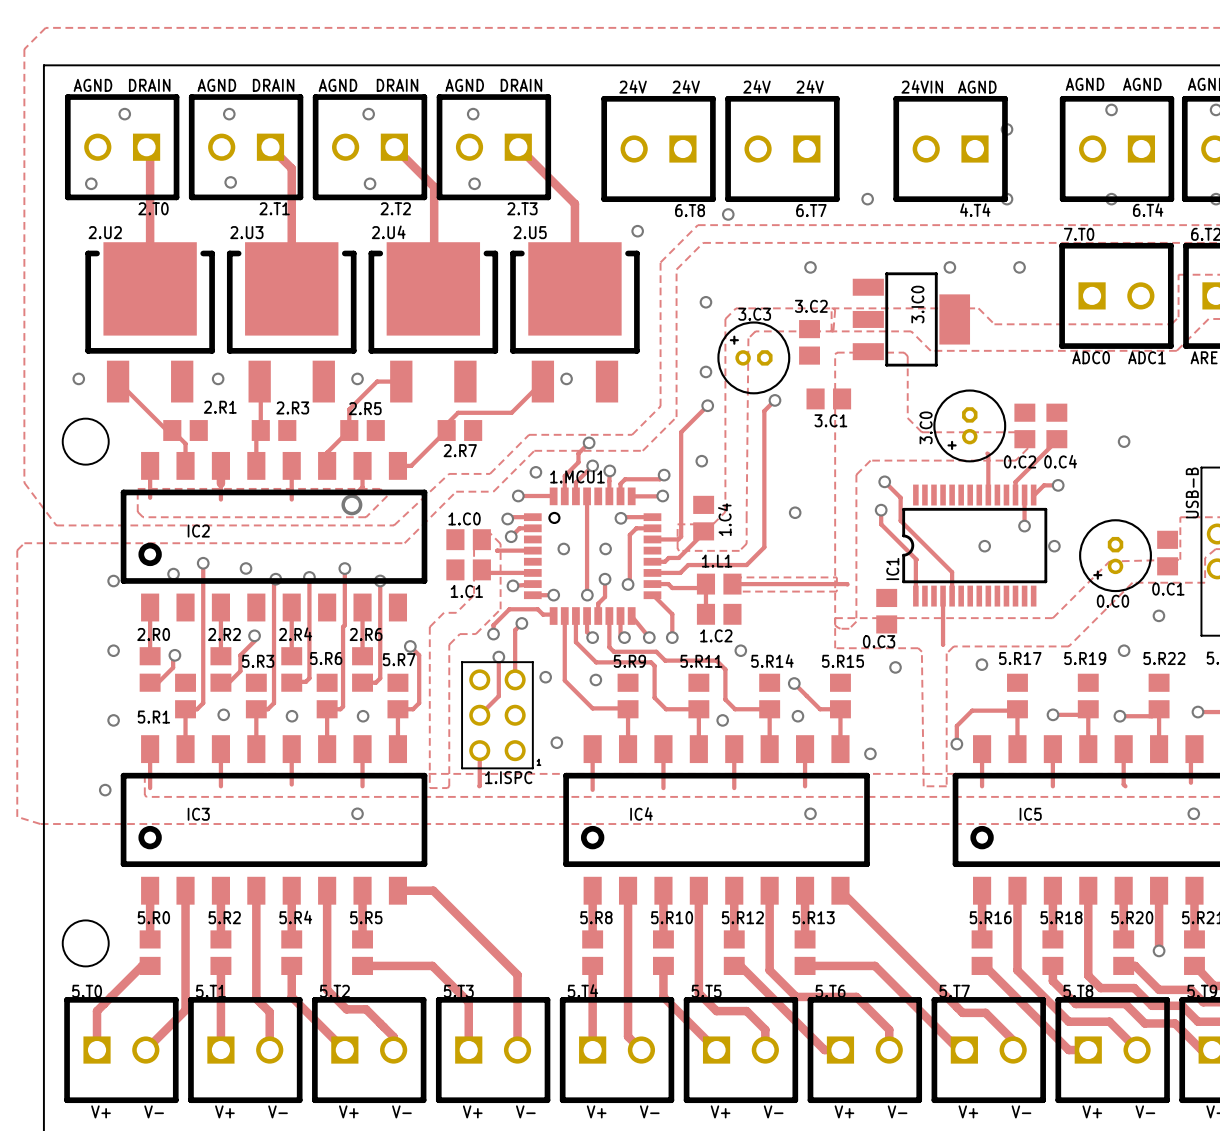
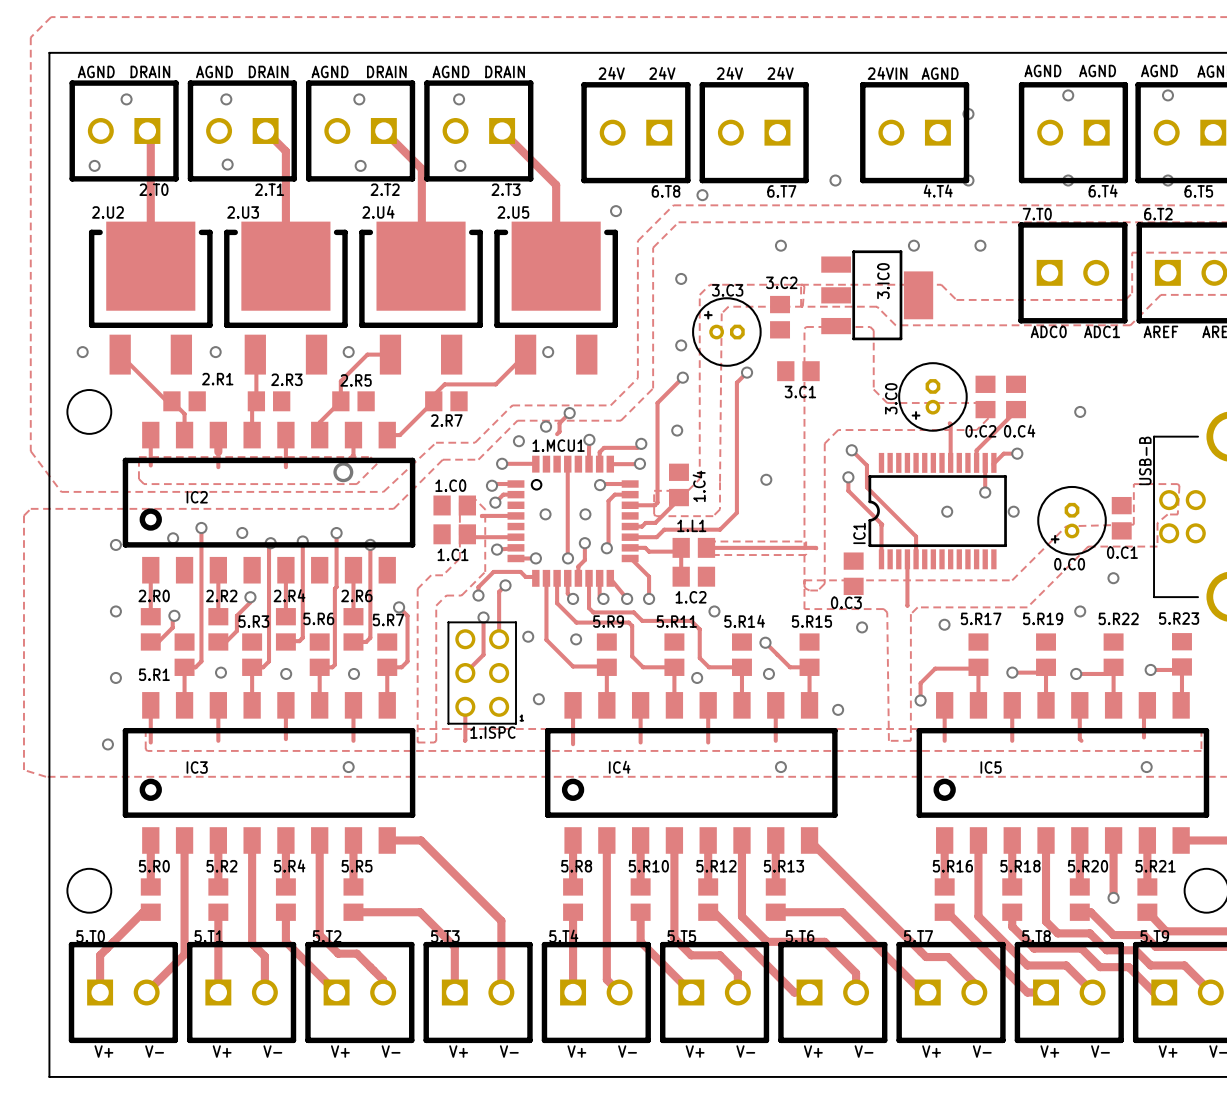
track: (575, 464) (564, 476) (564, 496) -> none
track: (592, 465) (575, 482) (575, 496) -> none
via position: (592, 465) -> (546, 426)

